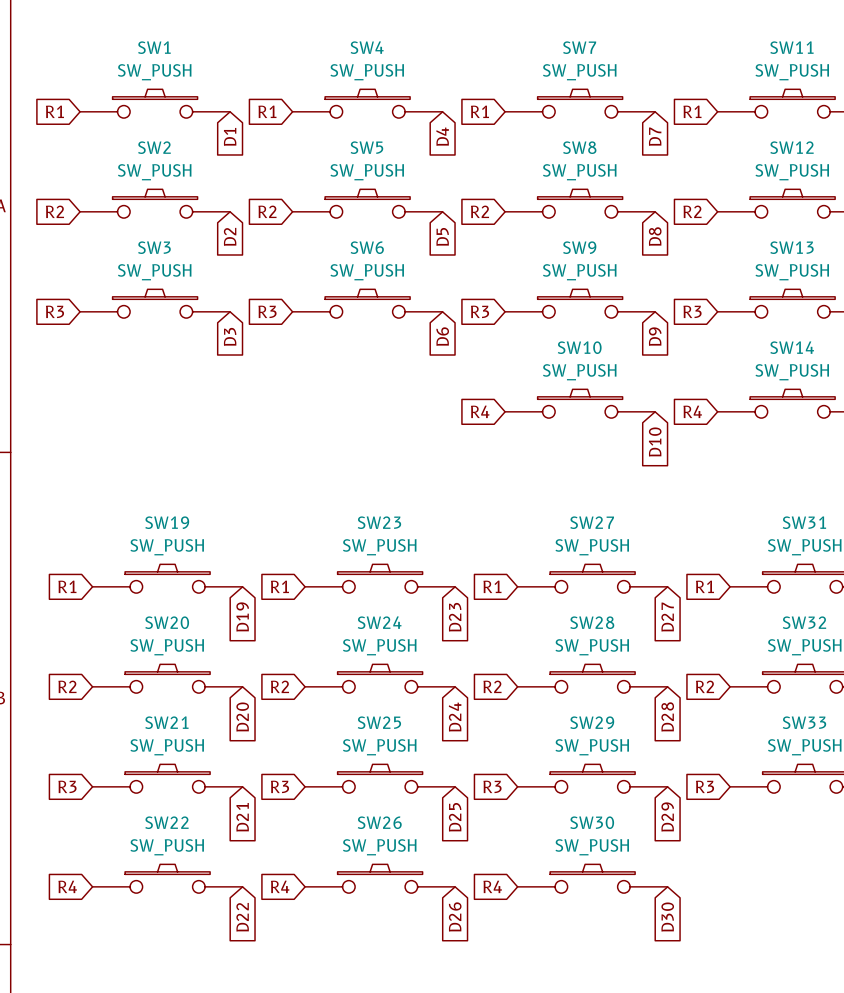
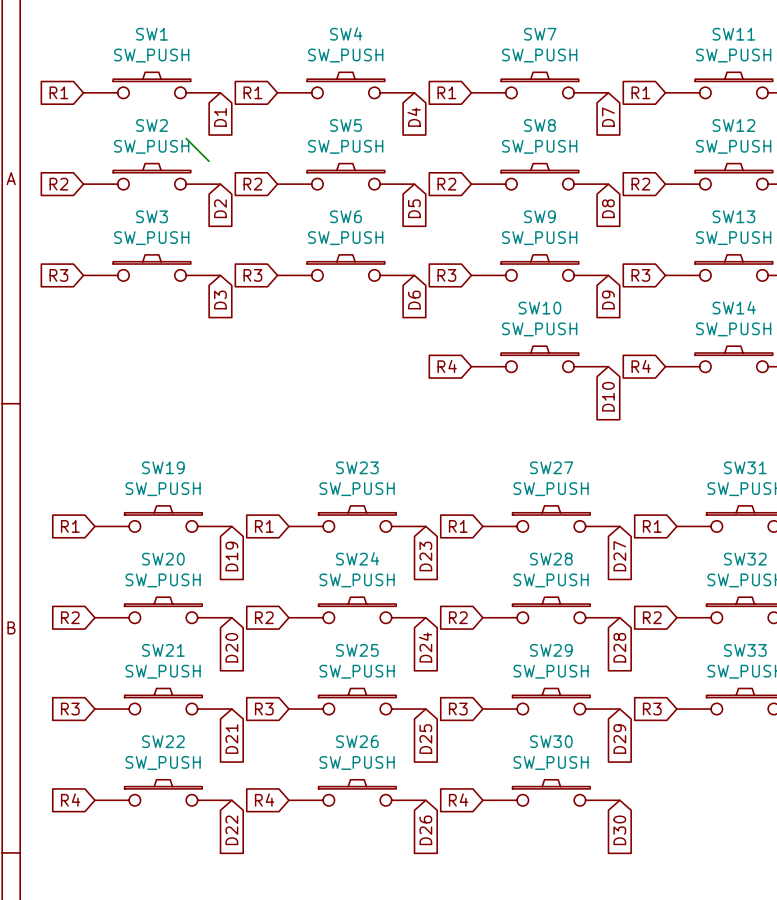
wire: none -> (186, 138) (209, 161)

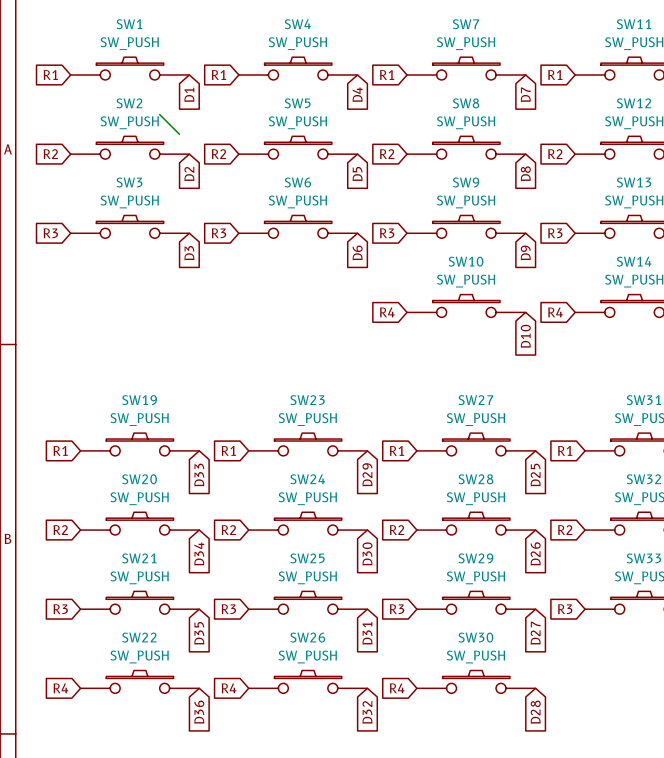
global label: D19 (231, 556) -> D33 (199, 474)
global label: D23 (425, 556) -> D29 (367, 474)
global label: D27 (619, 556) -> D25 (535, 474)
global label: D20 (231, 647) -> D34 (199, 553)
global label: D24 (425, 647) -> D30 (367, 553)
global label: D28 (619, 647) -> D26 (535, 553)
global label: D21 (231, 739) -> D35 (199, 633)
global label: D25 (425, 739) -> D31 (367, 633)
global label: D29 (619, 739) -> D27 (535, 633)
global label: D22 (231, 830) -> D36 (199, 712)
global label: D26 (425, 830) -> D32 (367, 712)
global label: D30 (619, 830) -> D28 (535, 712)

